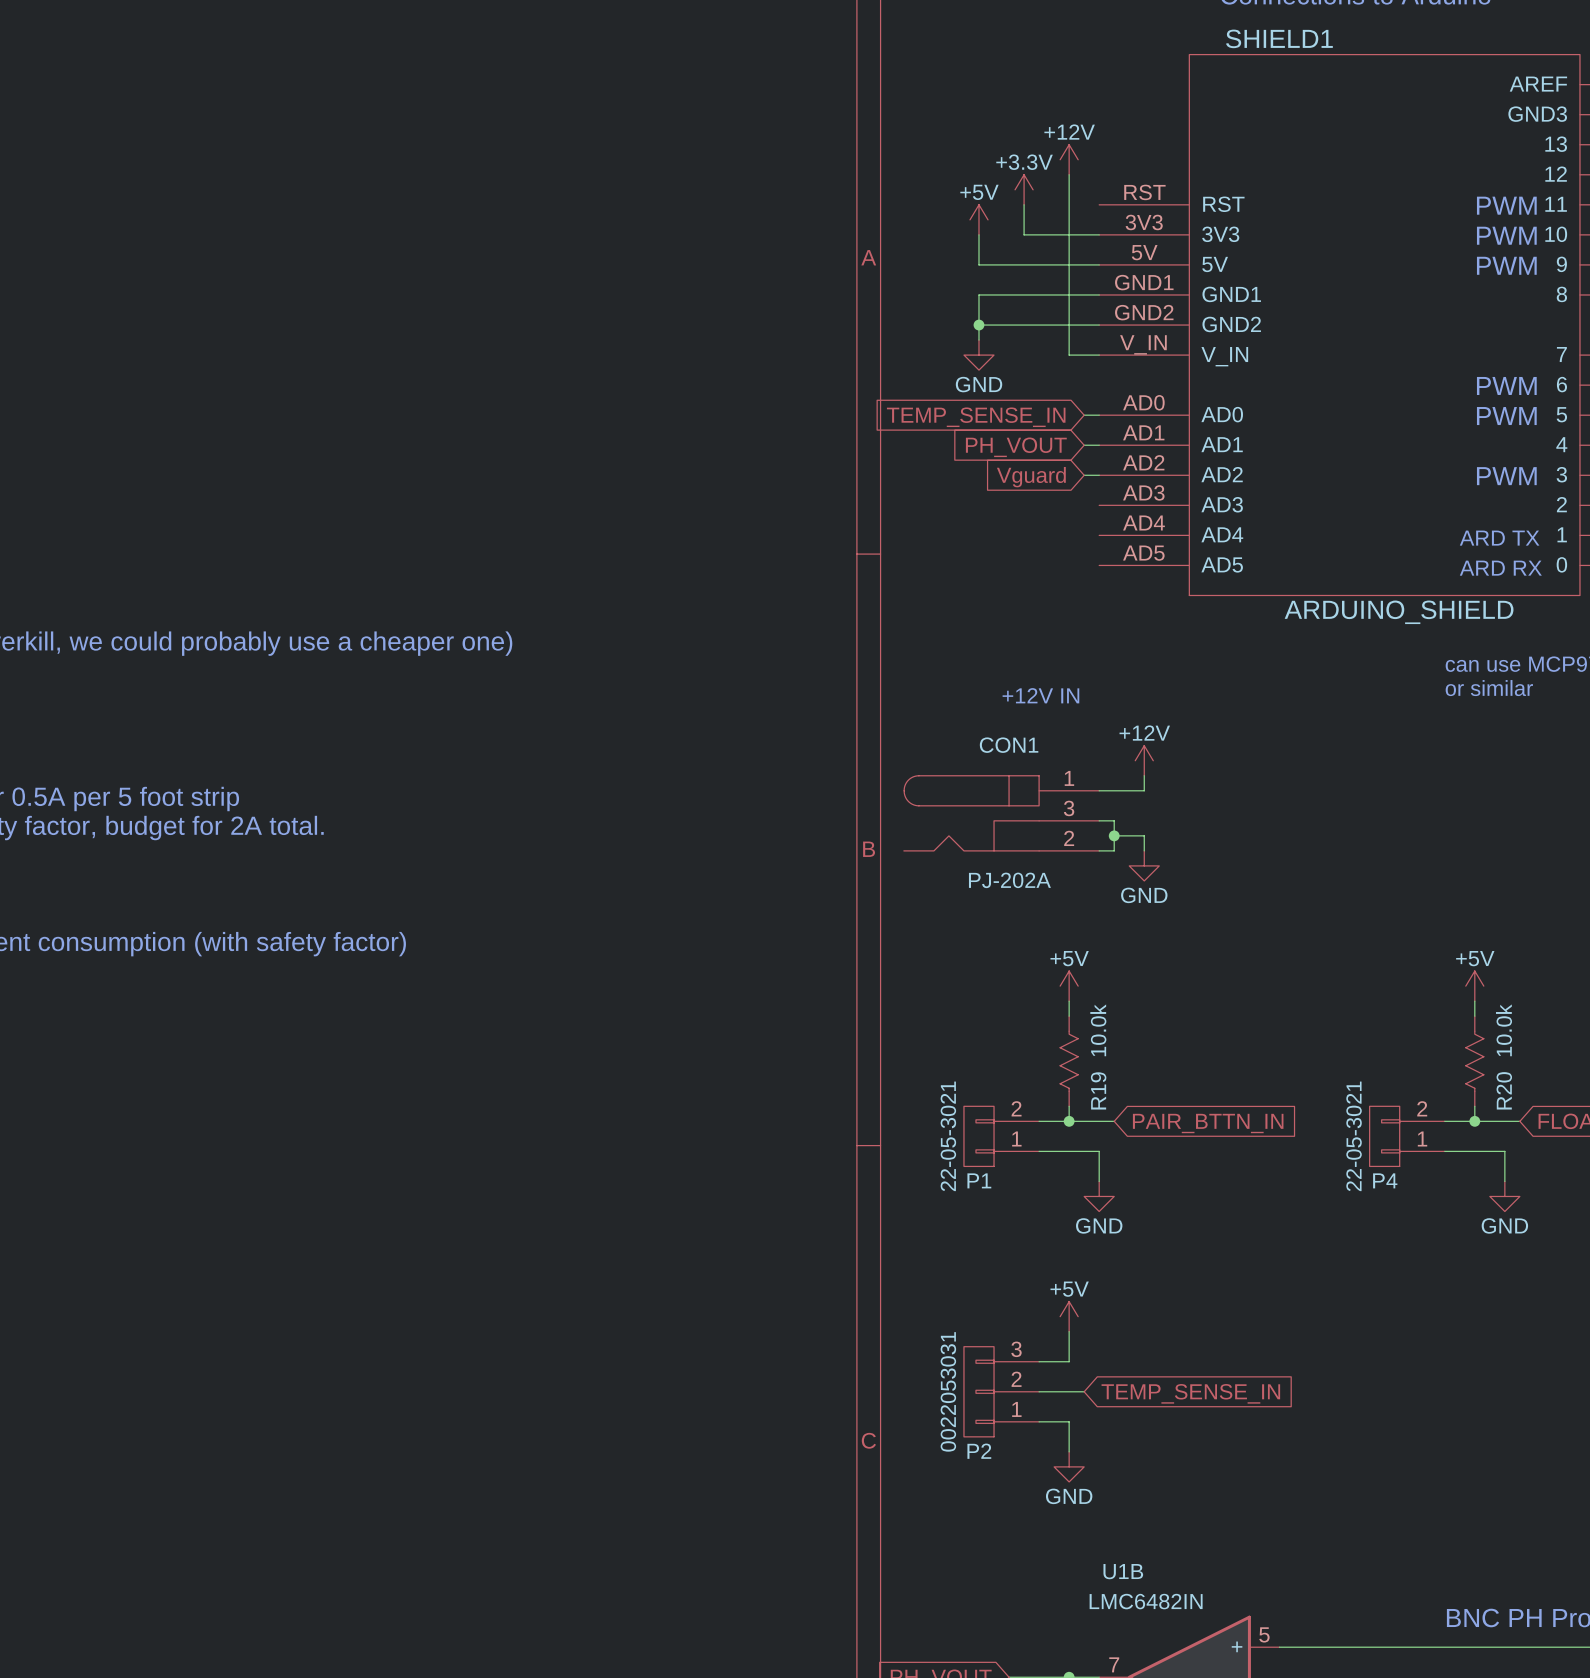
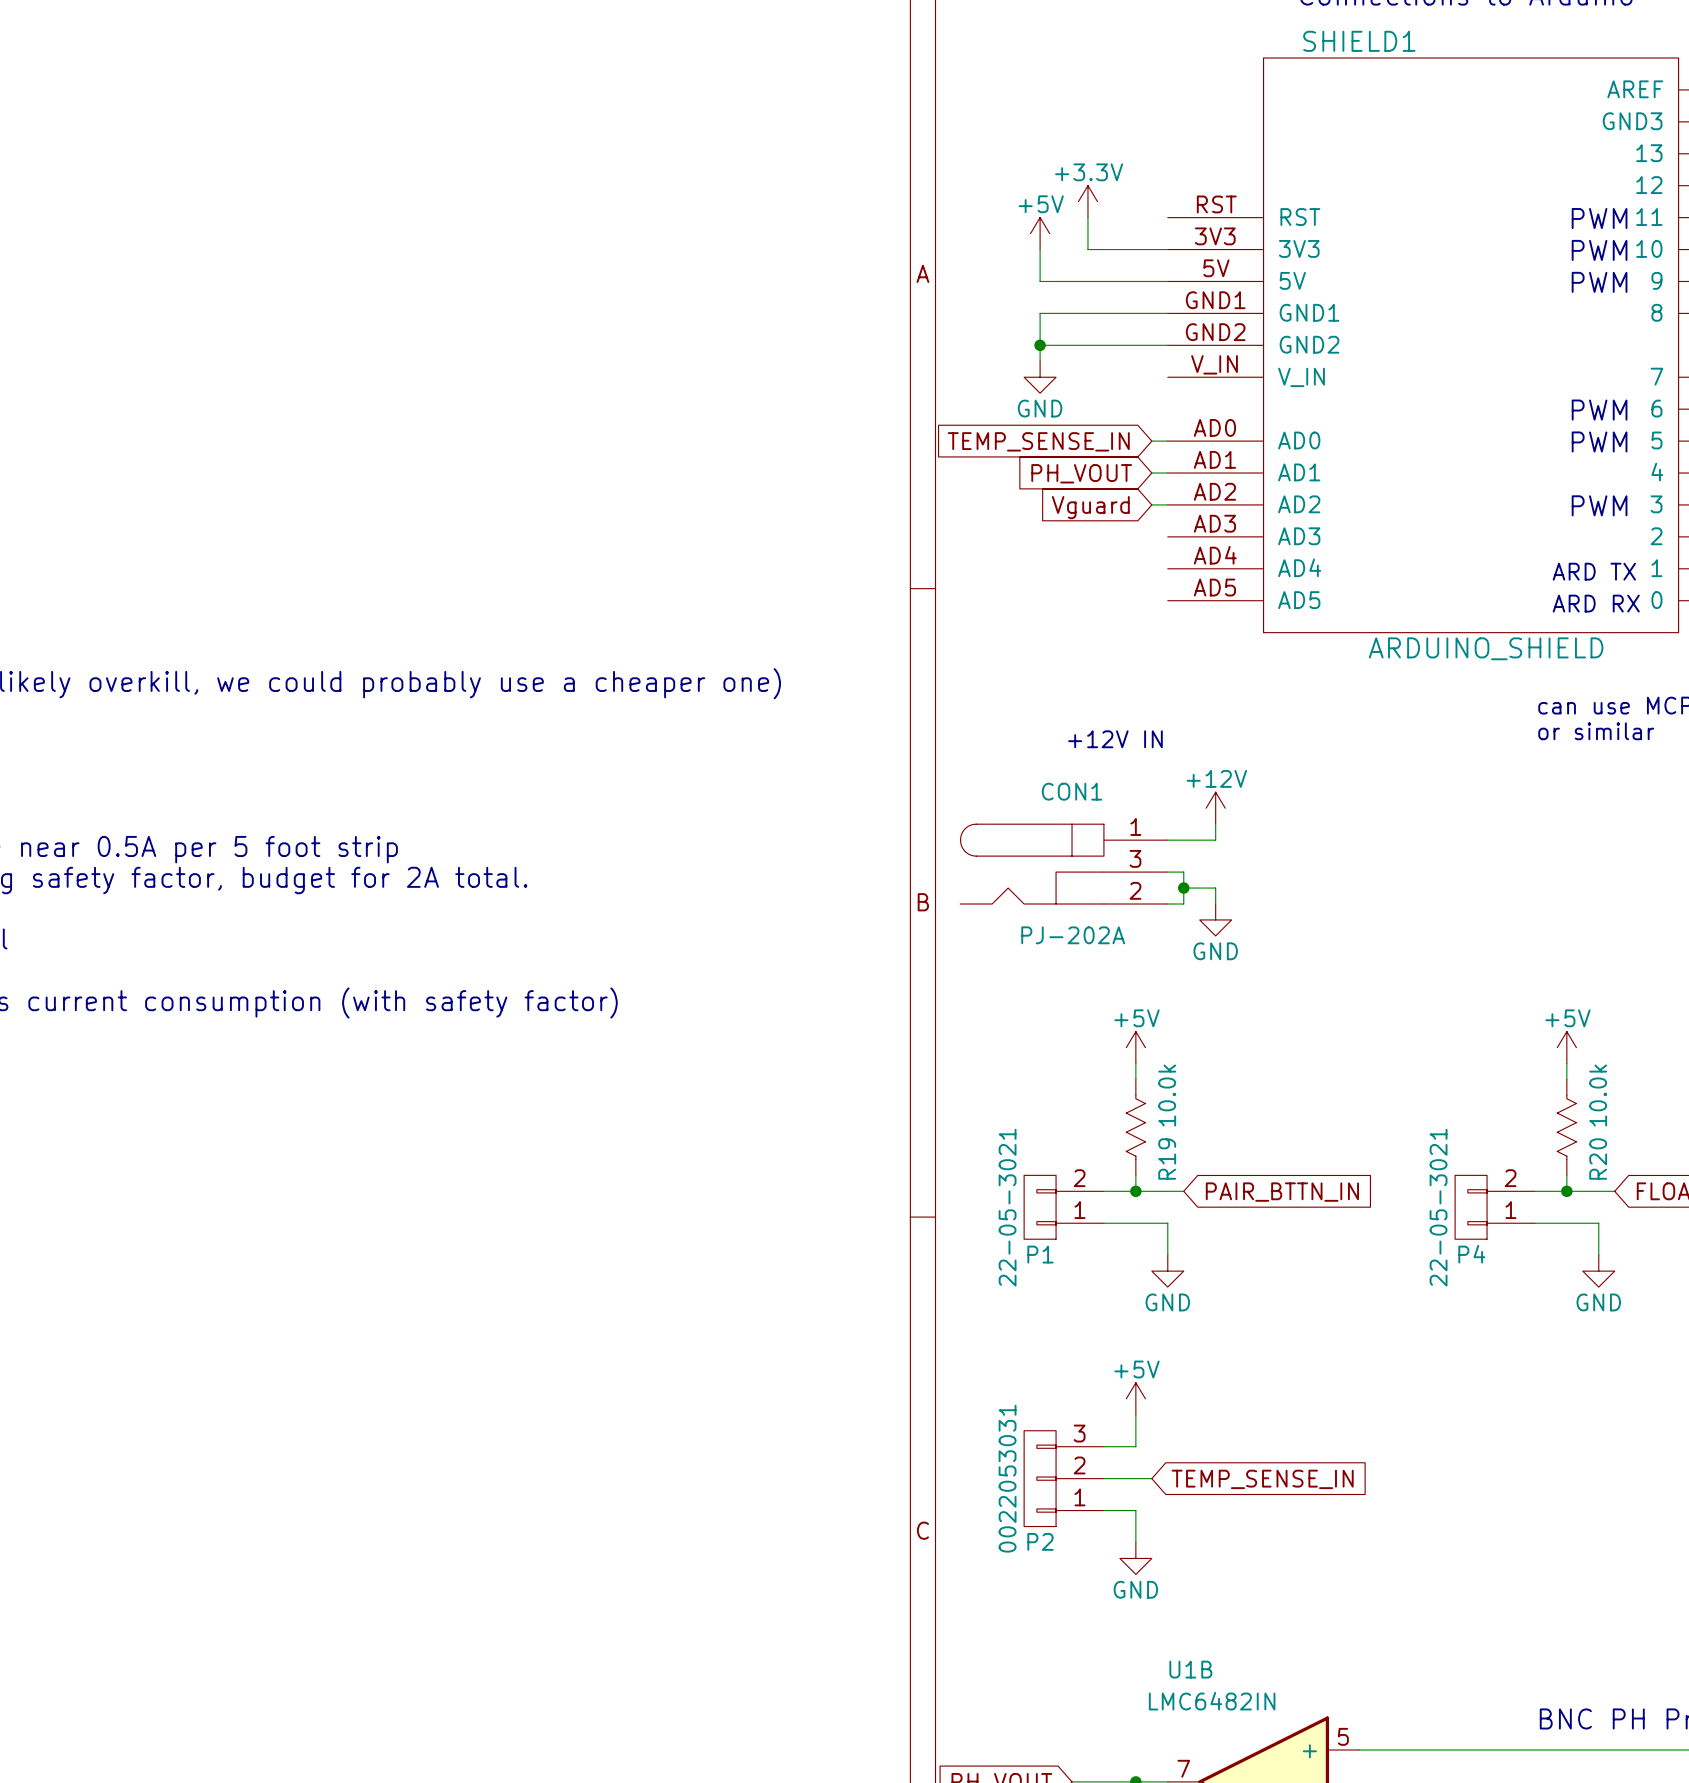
power symbol: +12V (1069, 159) -> none
wire: (1069, 174) (1069, 355) (1099, 355) -> none

